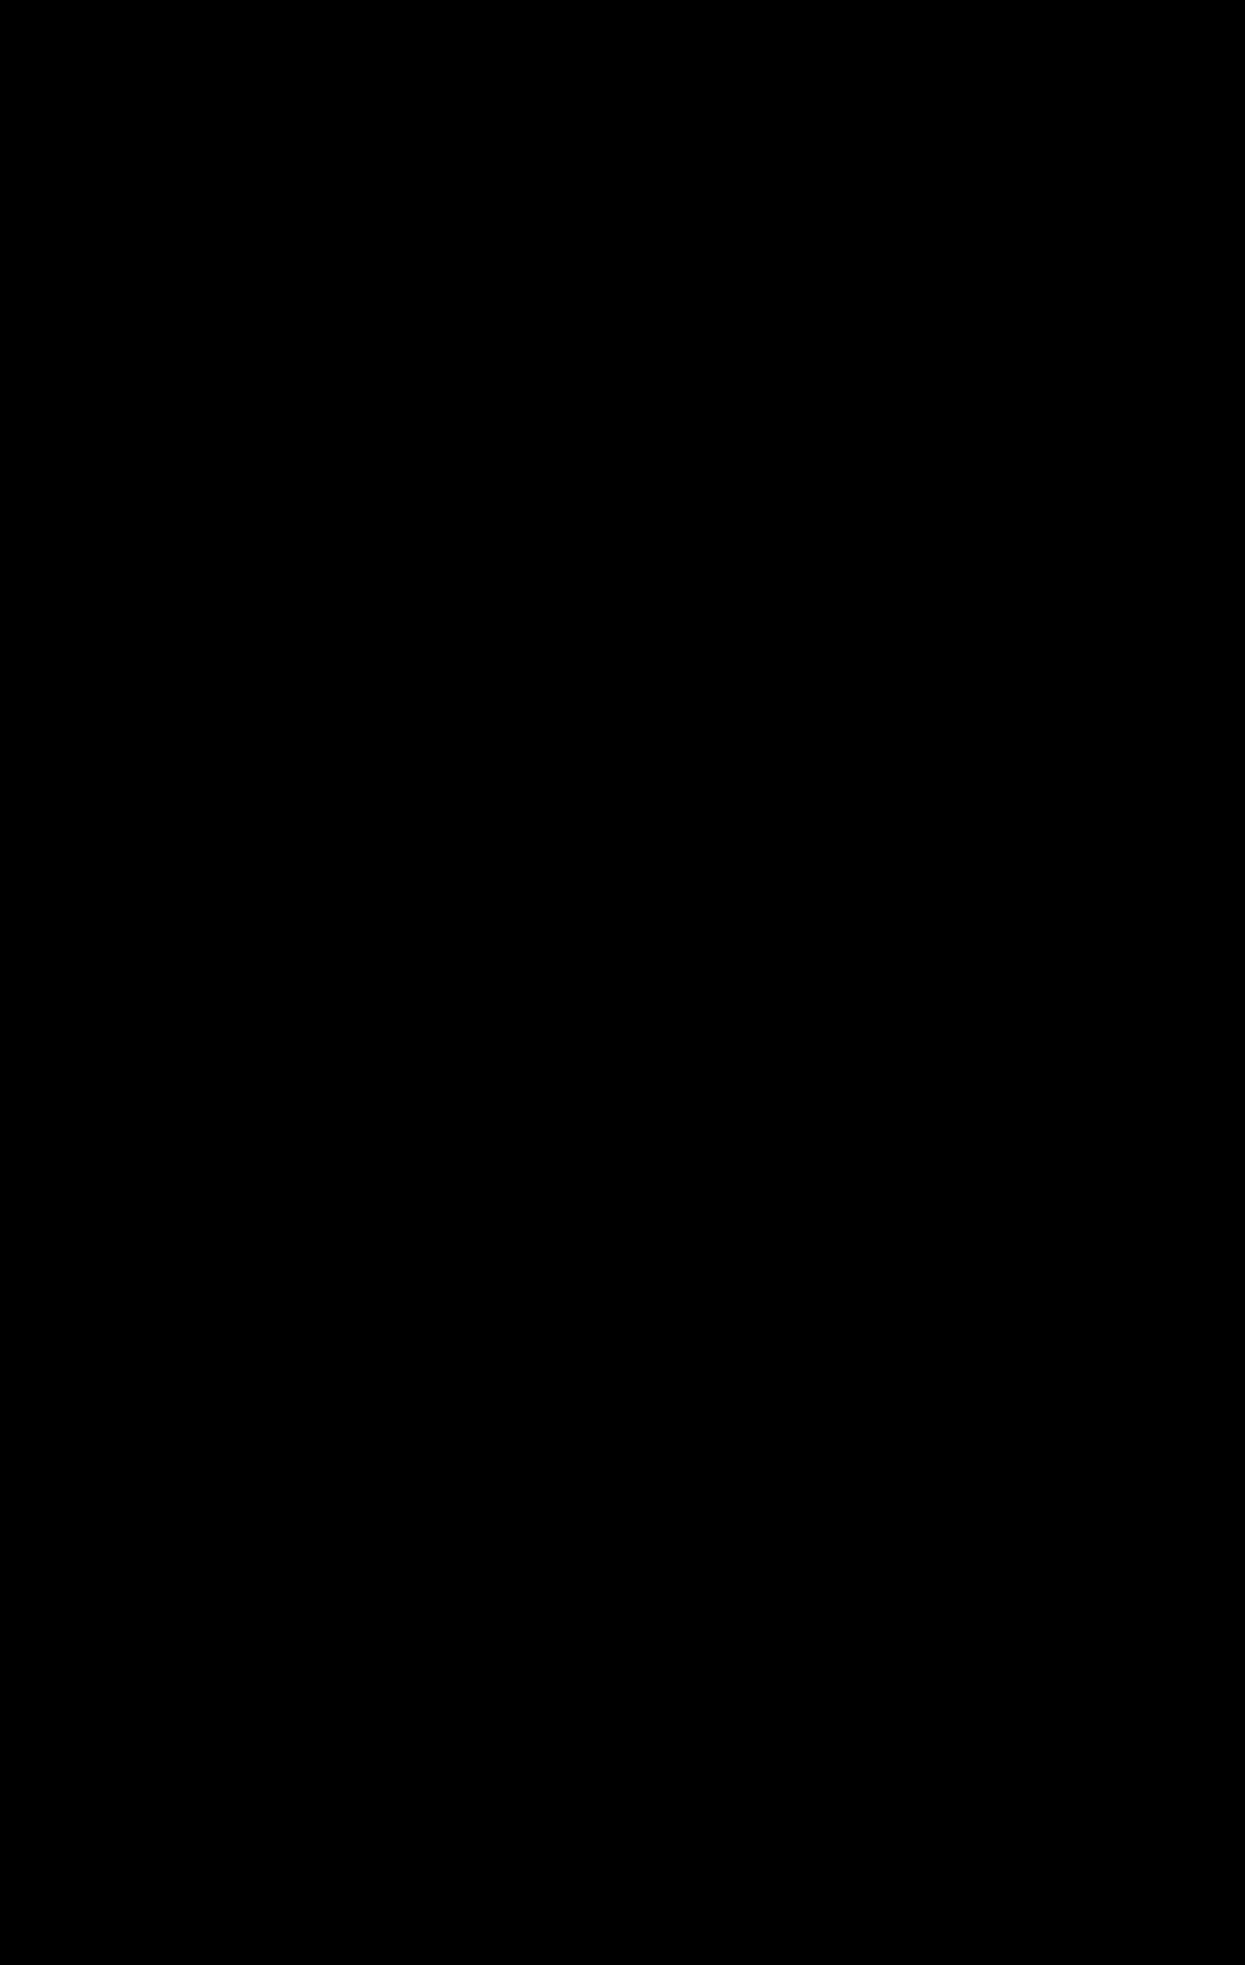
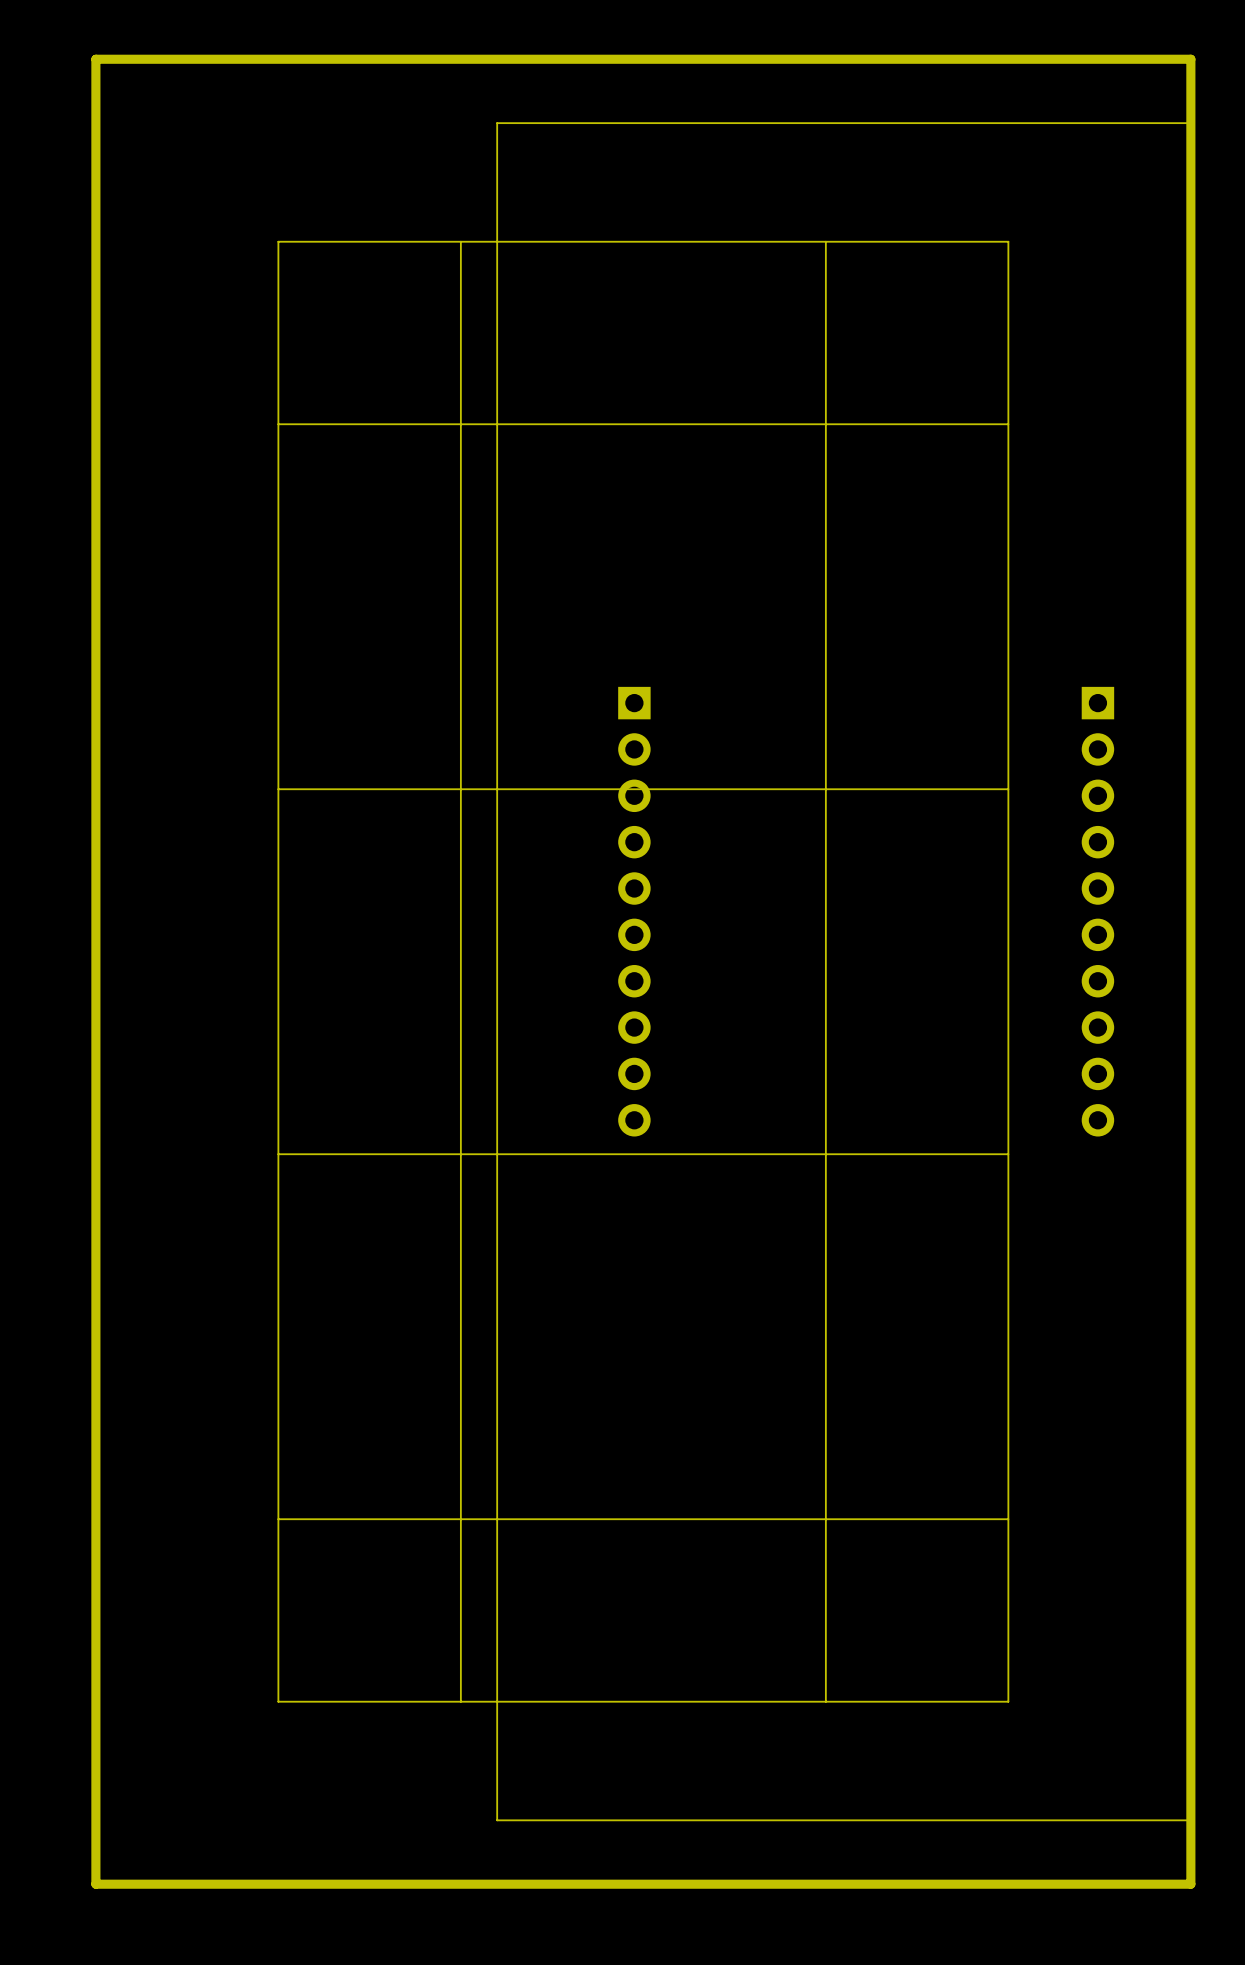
board edge: none -> (1190, 59) (95, 59) (95, 1884) (1190, 1884) (1190, 59)
board edge: none -> (1190, 123) (497, 123) (497, 1820) (1190, 1820) (1190, 123)
board edge: none -> (460, 241) (460, 1701)
board edge: none -> (825, 241) (825, 1701)
board edge: none -> (1008, 241) (278, 241) (278, 1701) (1008, 1701) (1008, 241)
board edge: none -> (1008, 424) (278, 424)
board edge: none -> (1008, 789) (278, 789)
part: none -> (634, 911)
part: none -> (1097, 911)
board edge: none -> (1008, 1154) (278, 1154)
board edge: none -> (1008, 1519) (278, 1519)

